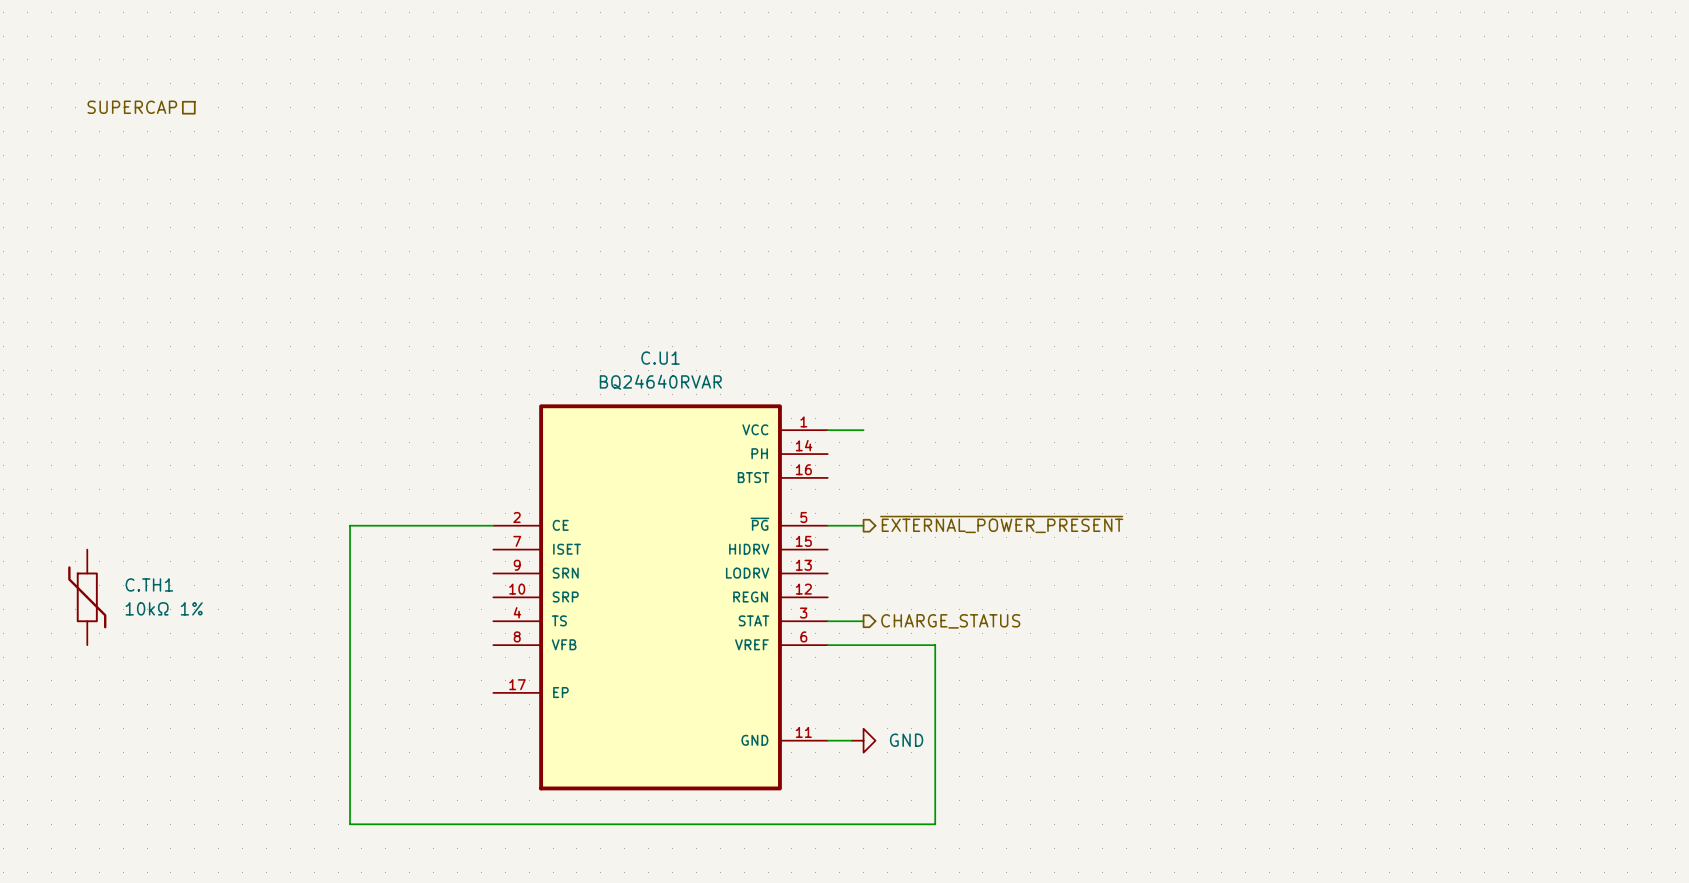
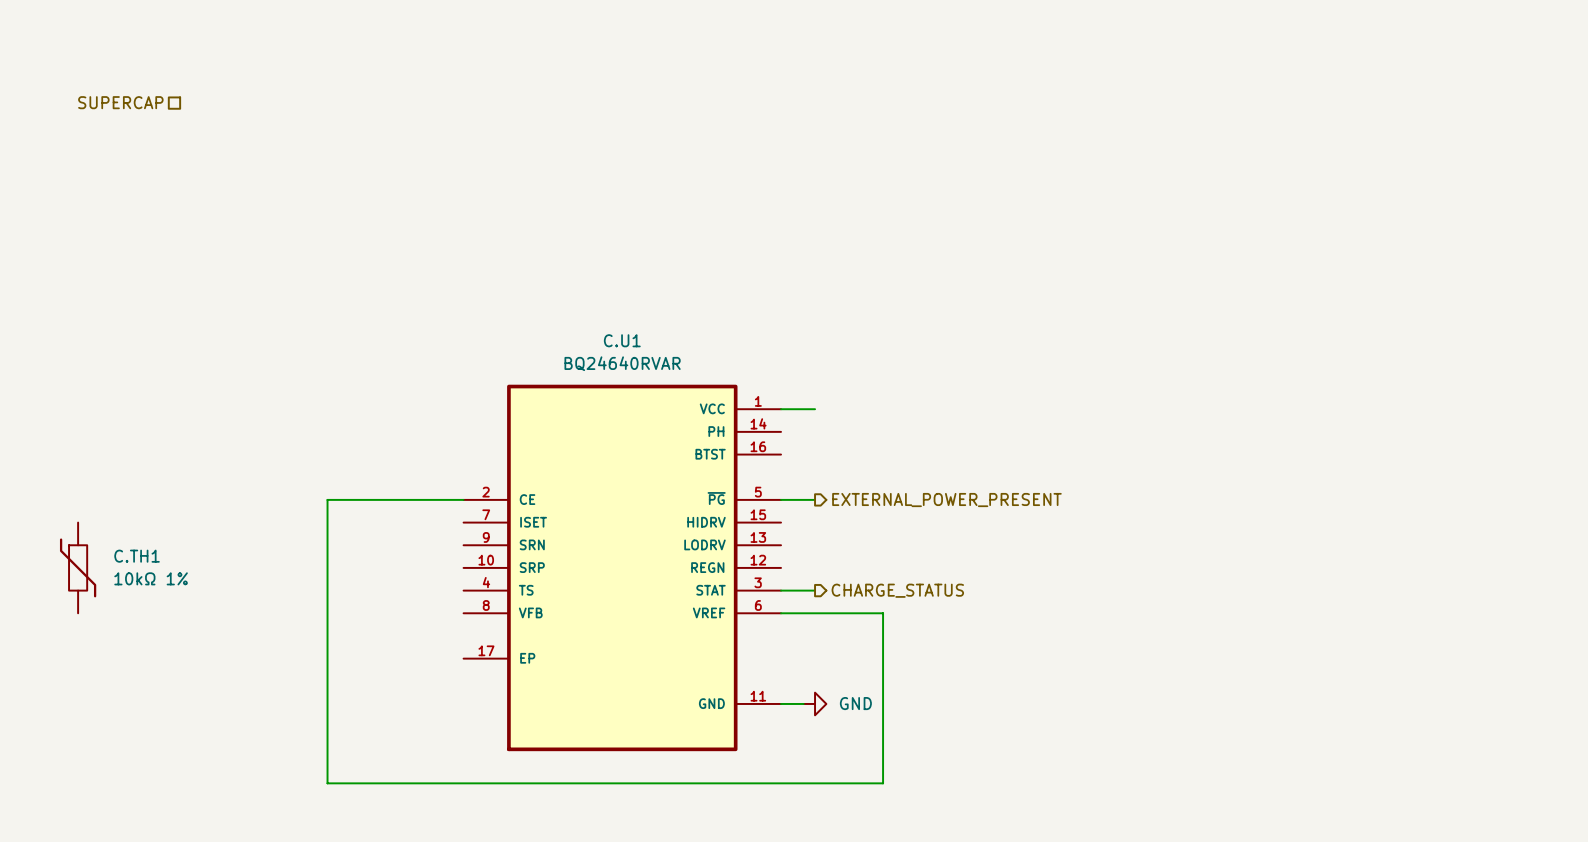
hierarchical label: ~{EXTERNAL_POWER_PRESENT} (1001, 524) -> EXTERNAL_POWER_PRESENT (946, 500)

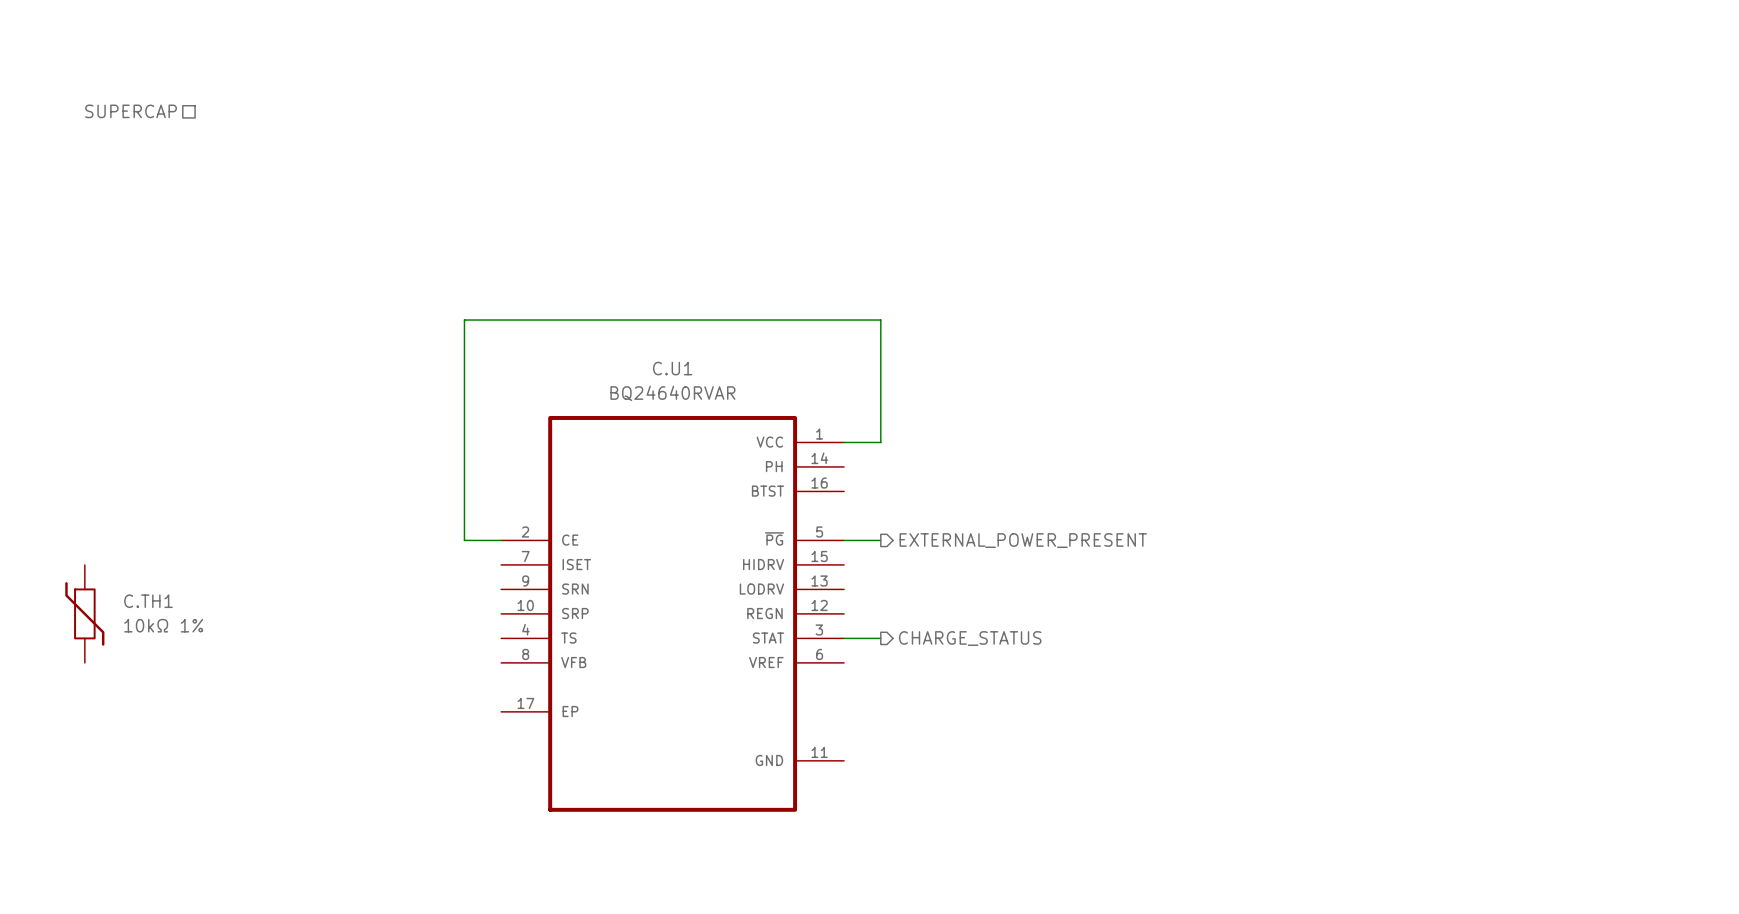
wire: (429, 499) (327, 499) (327, 783) (883, 783) (883, 613) (781, 613) -> (464, 540) (464, 320) (880, 320) (880, 442)
wire: (781, 703) (803, 703) -> none
power symbol: GND (815, 703) -> none

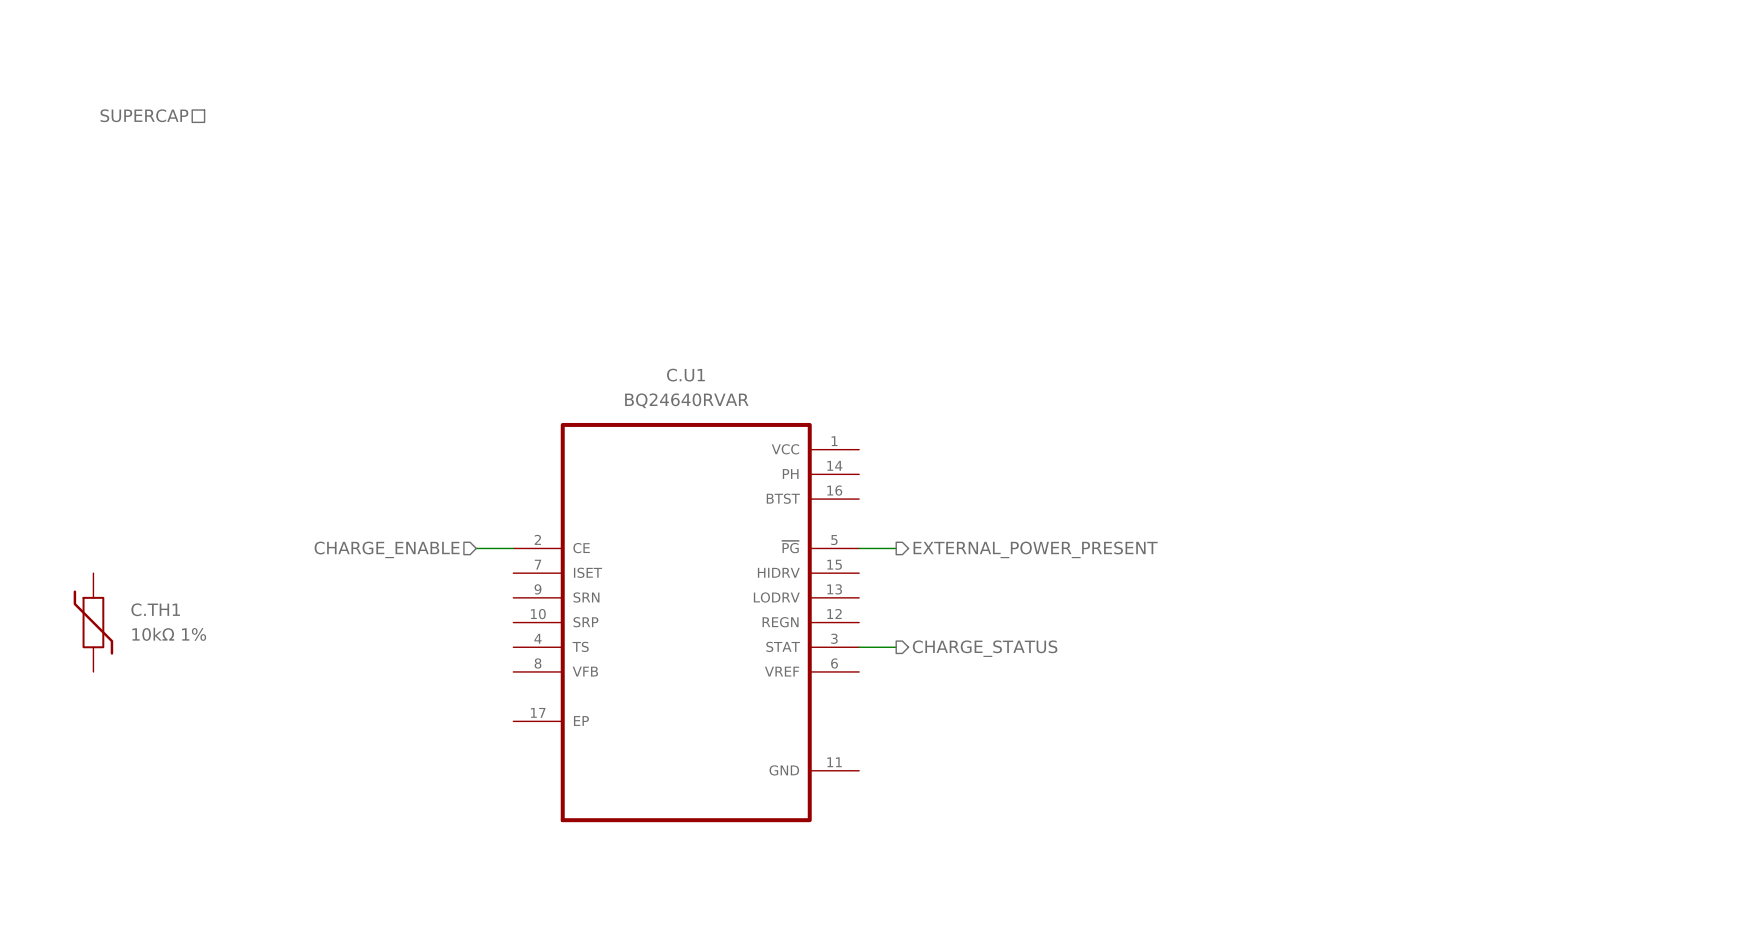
wire: (844, 442) (880, 442) (880, 320) (464, 320) (464, 540) -> none
hierarchical label: none -> CHARGE_ENABLE (387, 549)

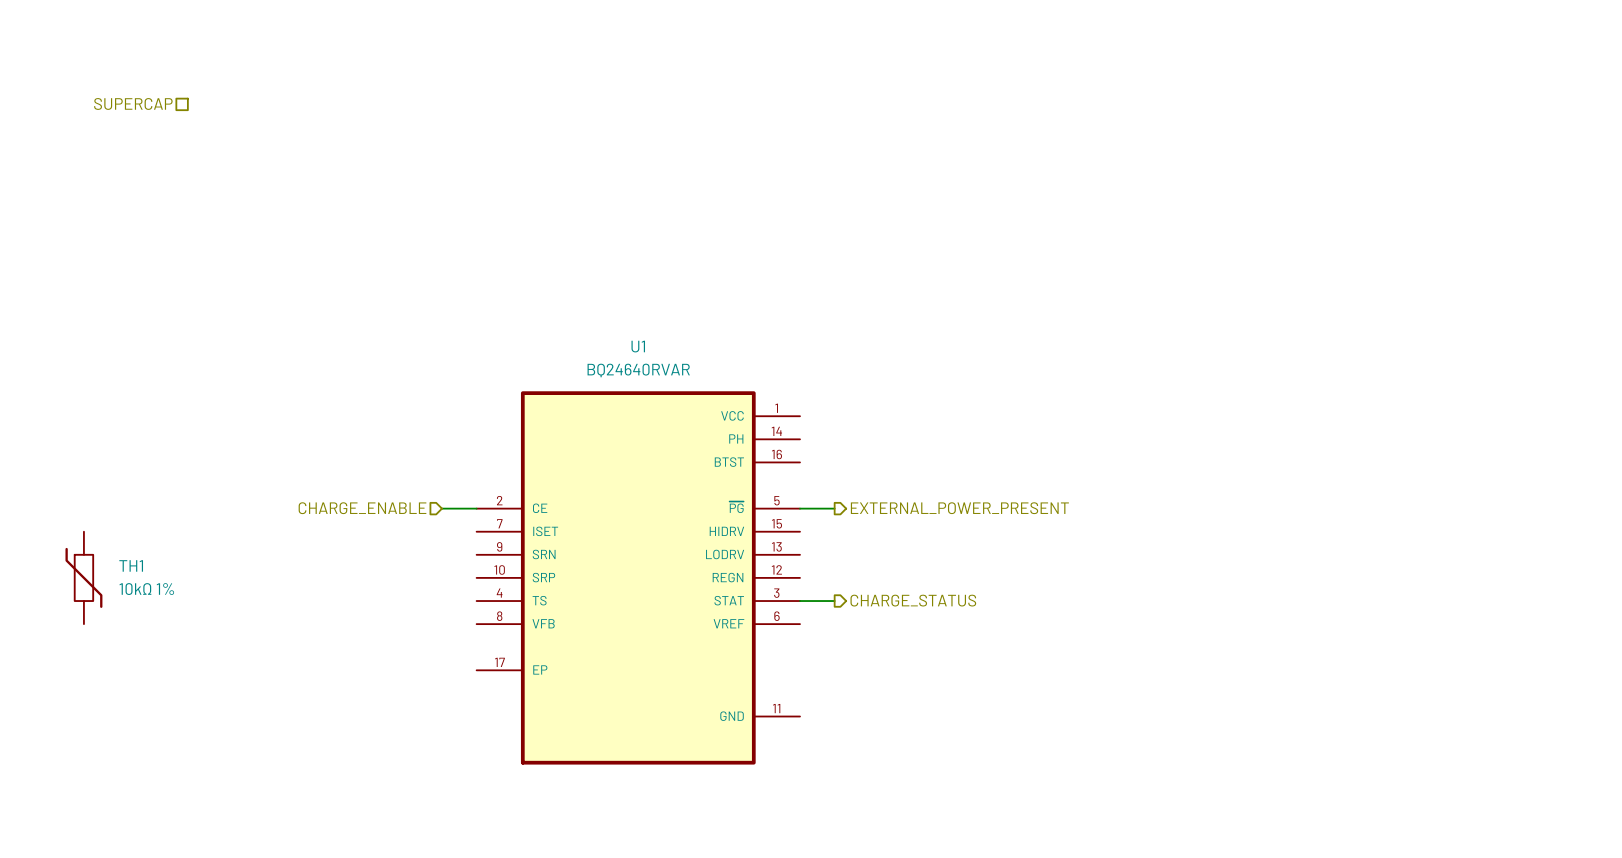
C.U1 name: C.U1 (685, 375) -> U1 (638, 346)
C.TH1 name: C.TH1 (155, 609) -> TH1 (131, 565)

